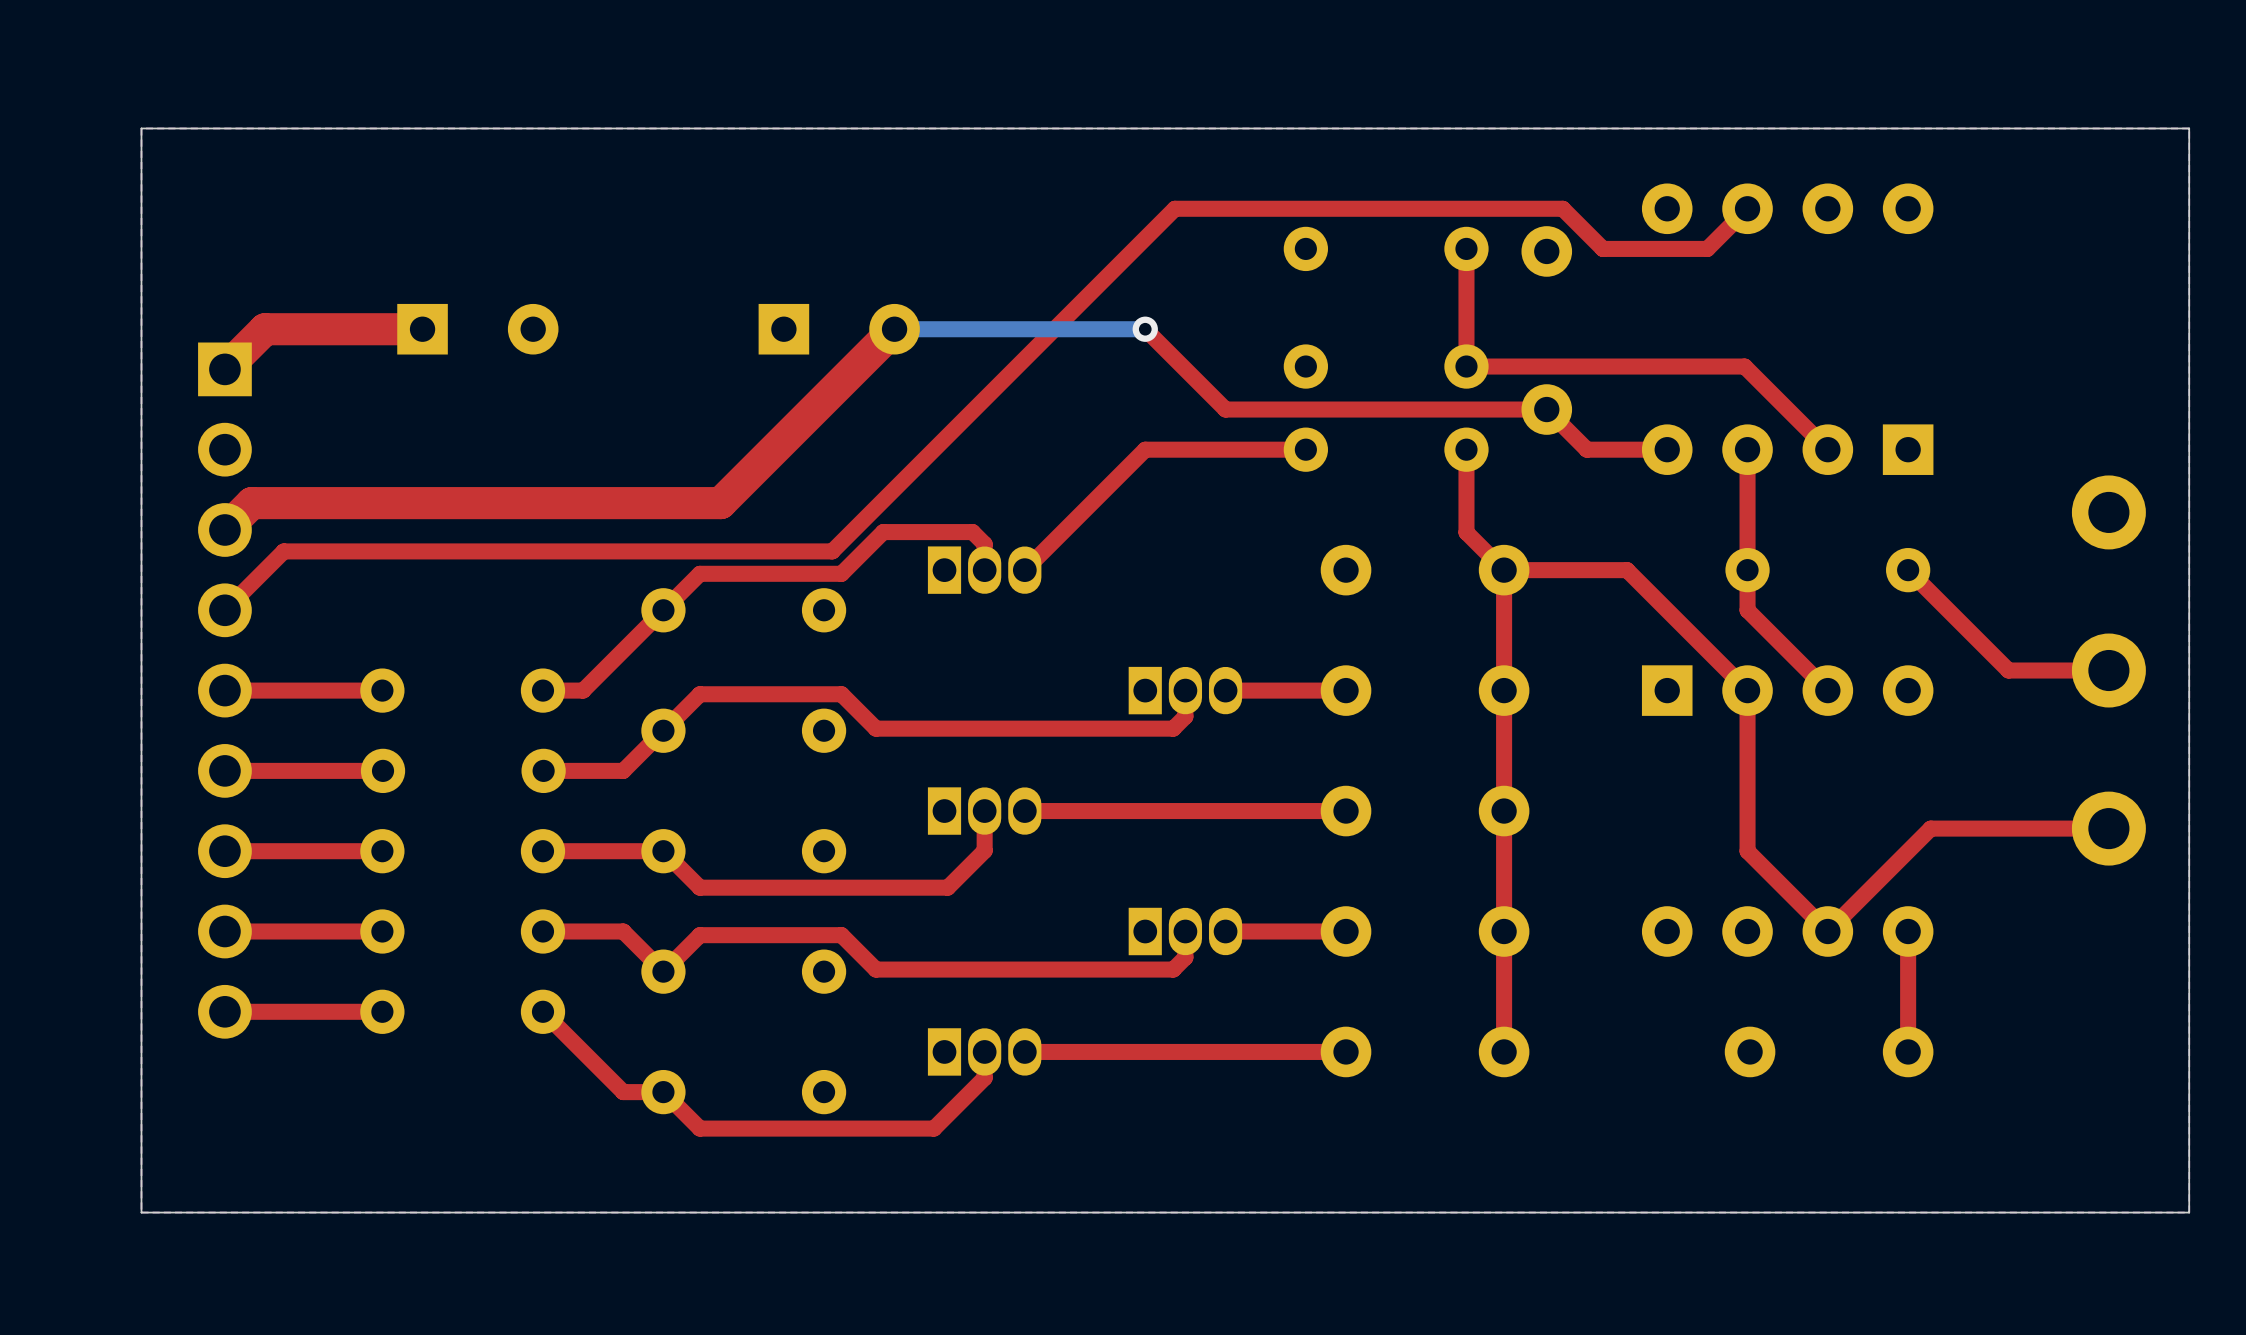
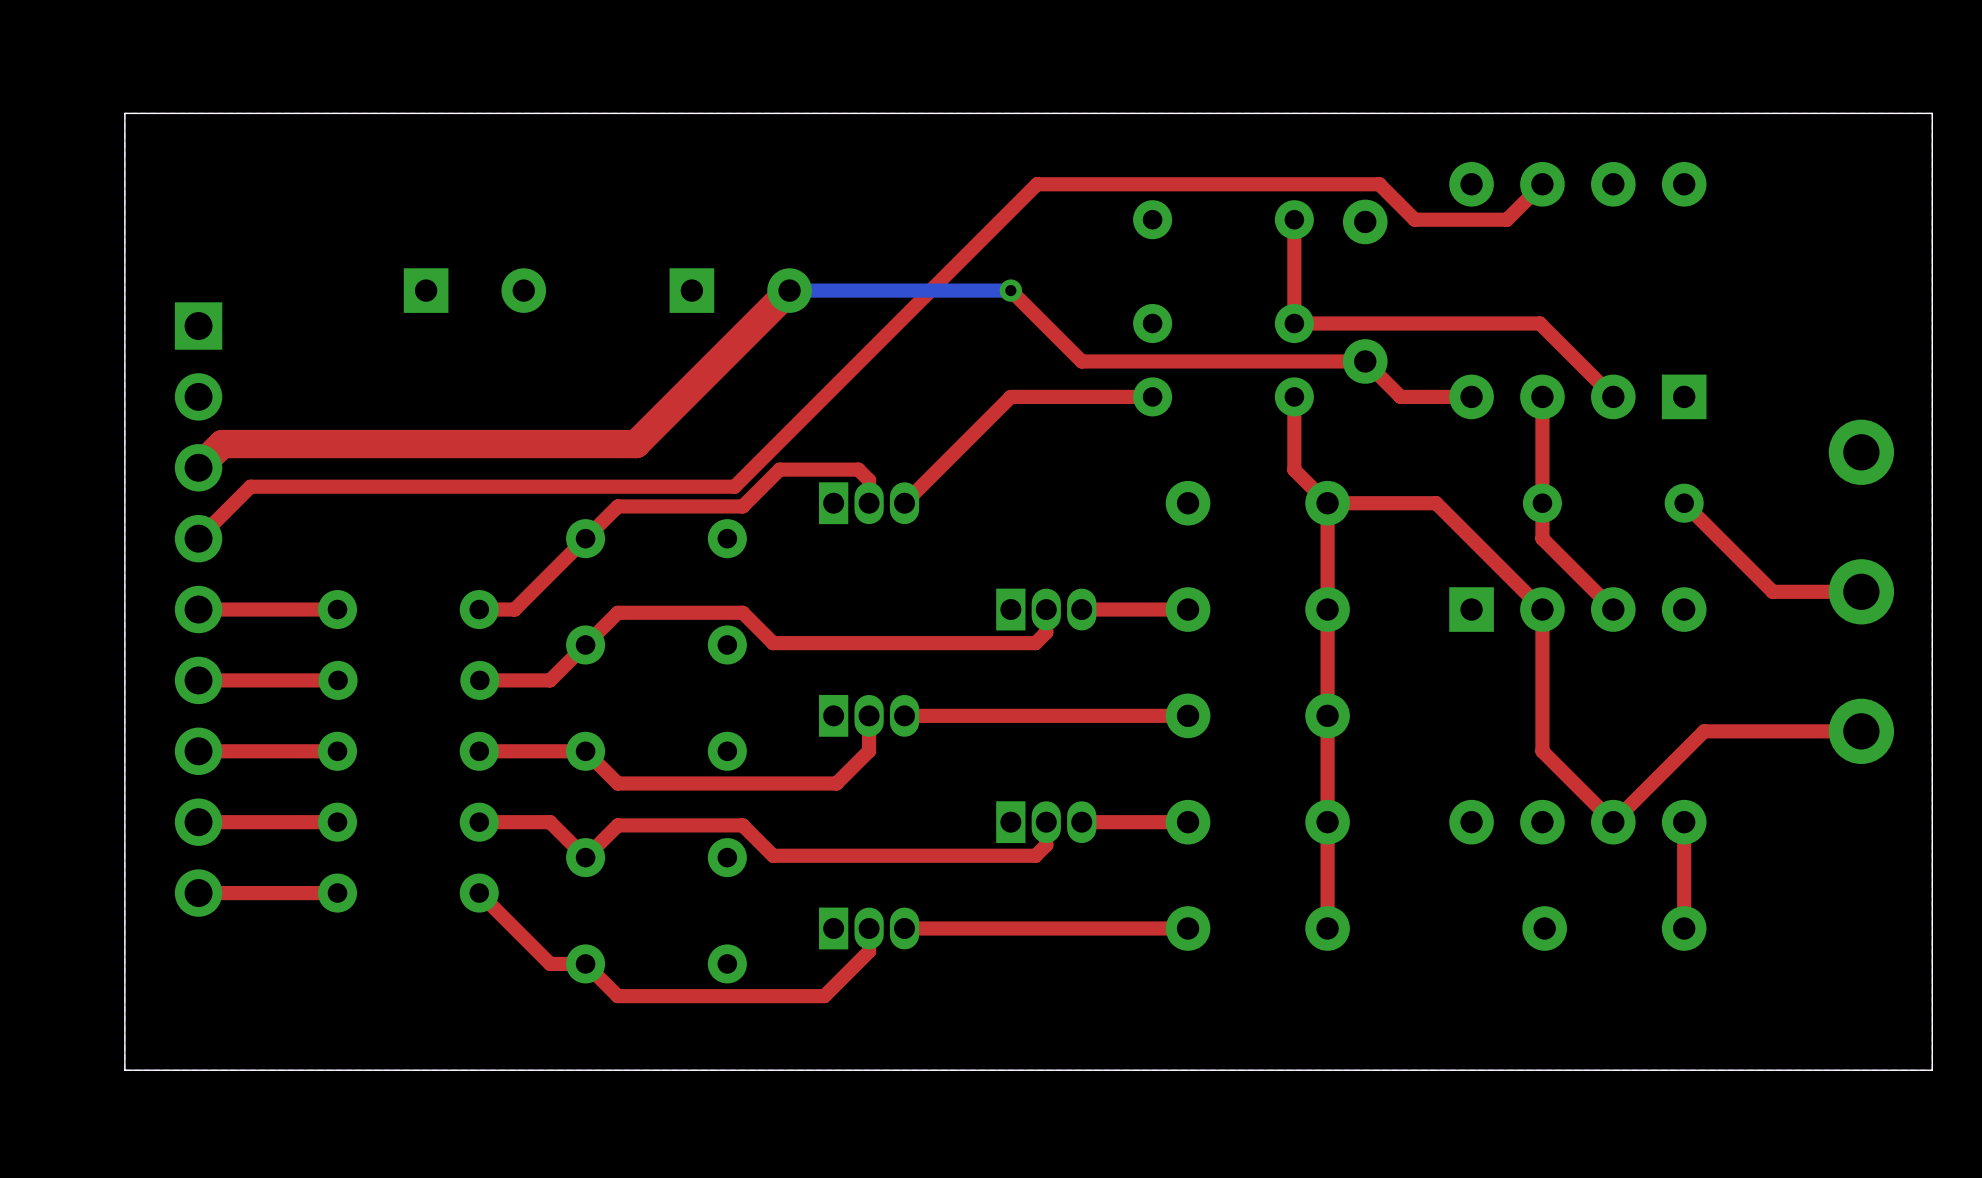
top track: (422, 329) (265, 329) (224, 369) -> none
part position: (477, 329) -> (474, 290)

